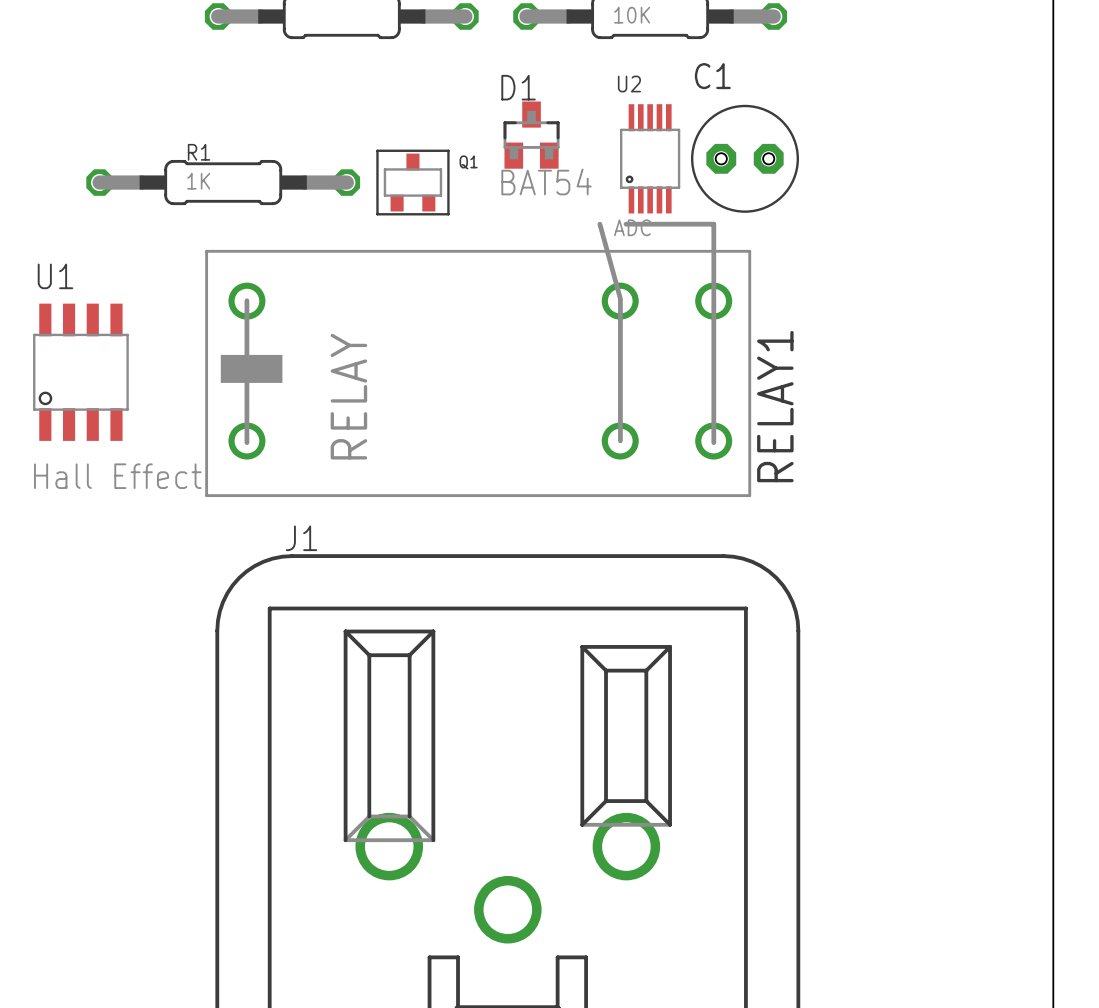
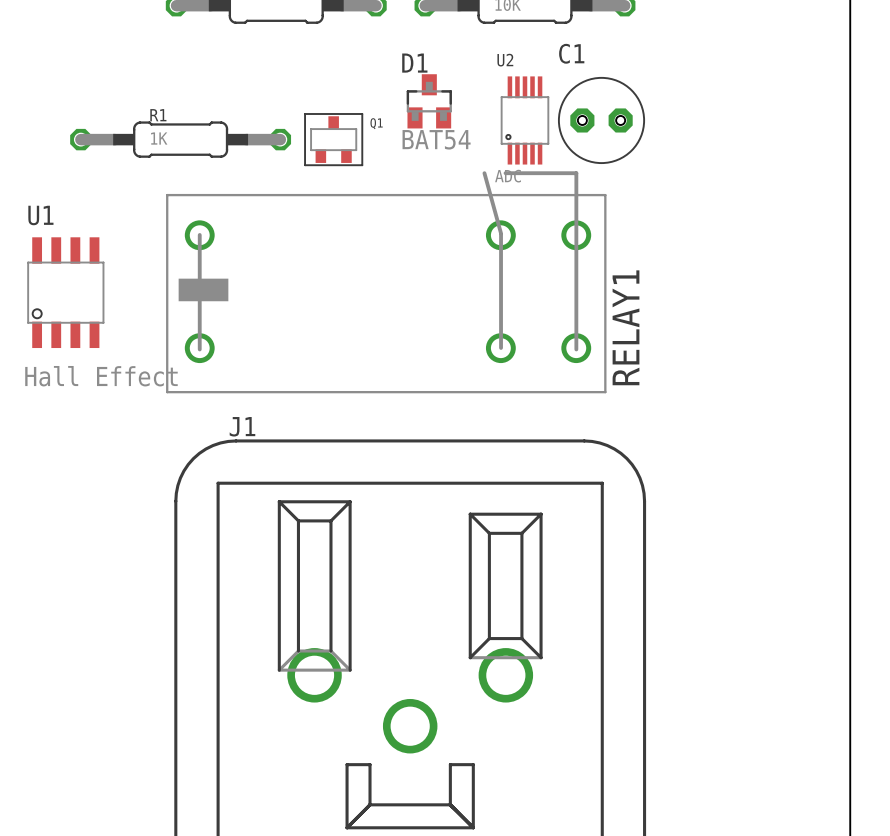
RELAY1 value: RELAY (348, 396) -> none

